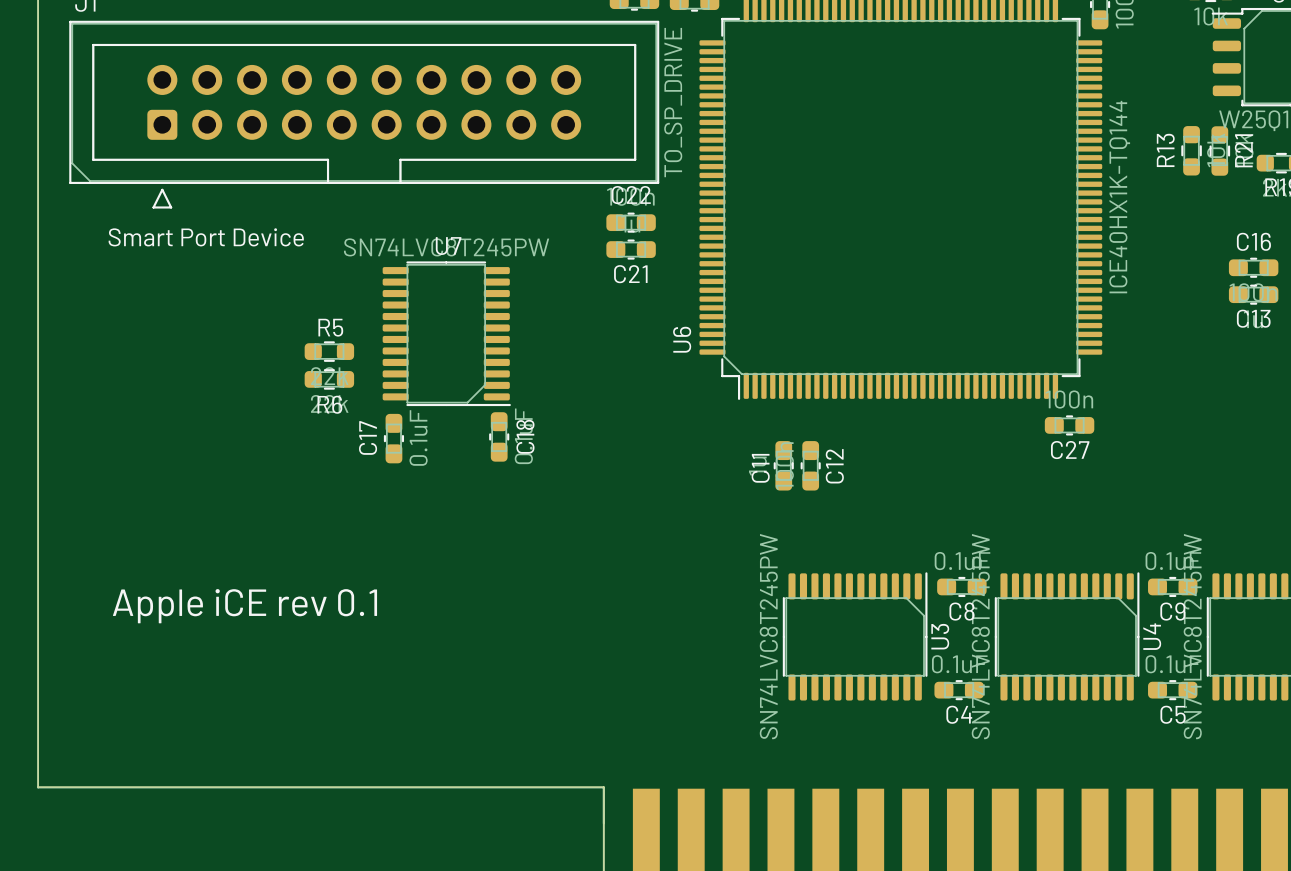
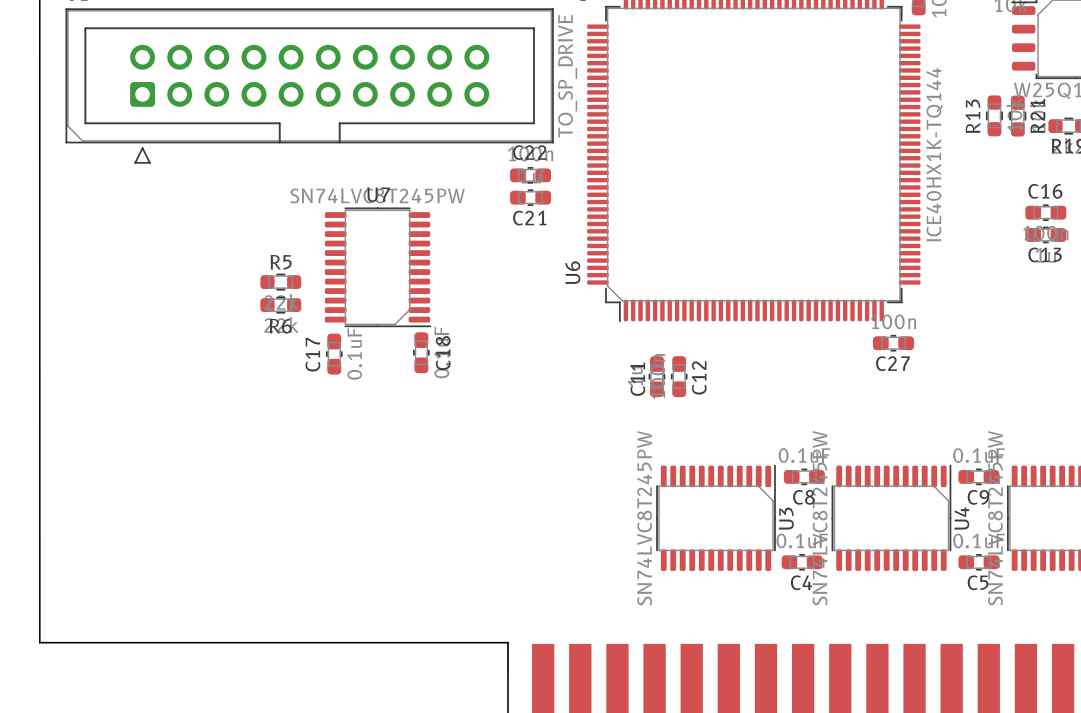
text: Smart Port Device (206, 237) -> none
text: Apple iCE rev 0.1 (244, 606) -> none

